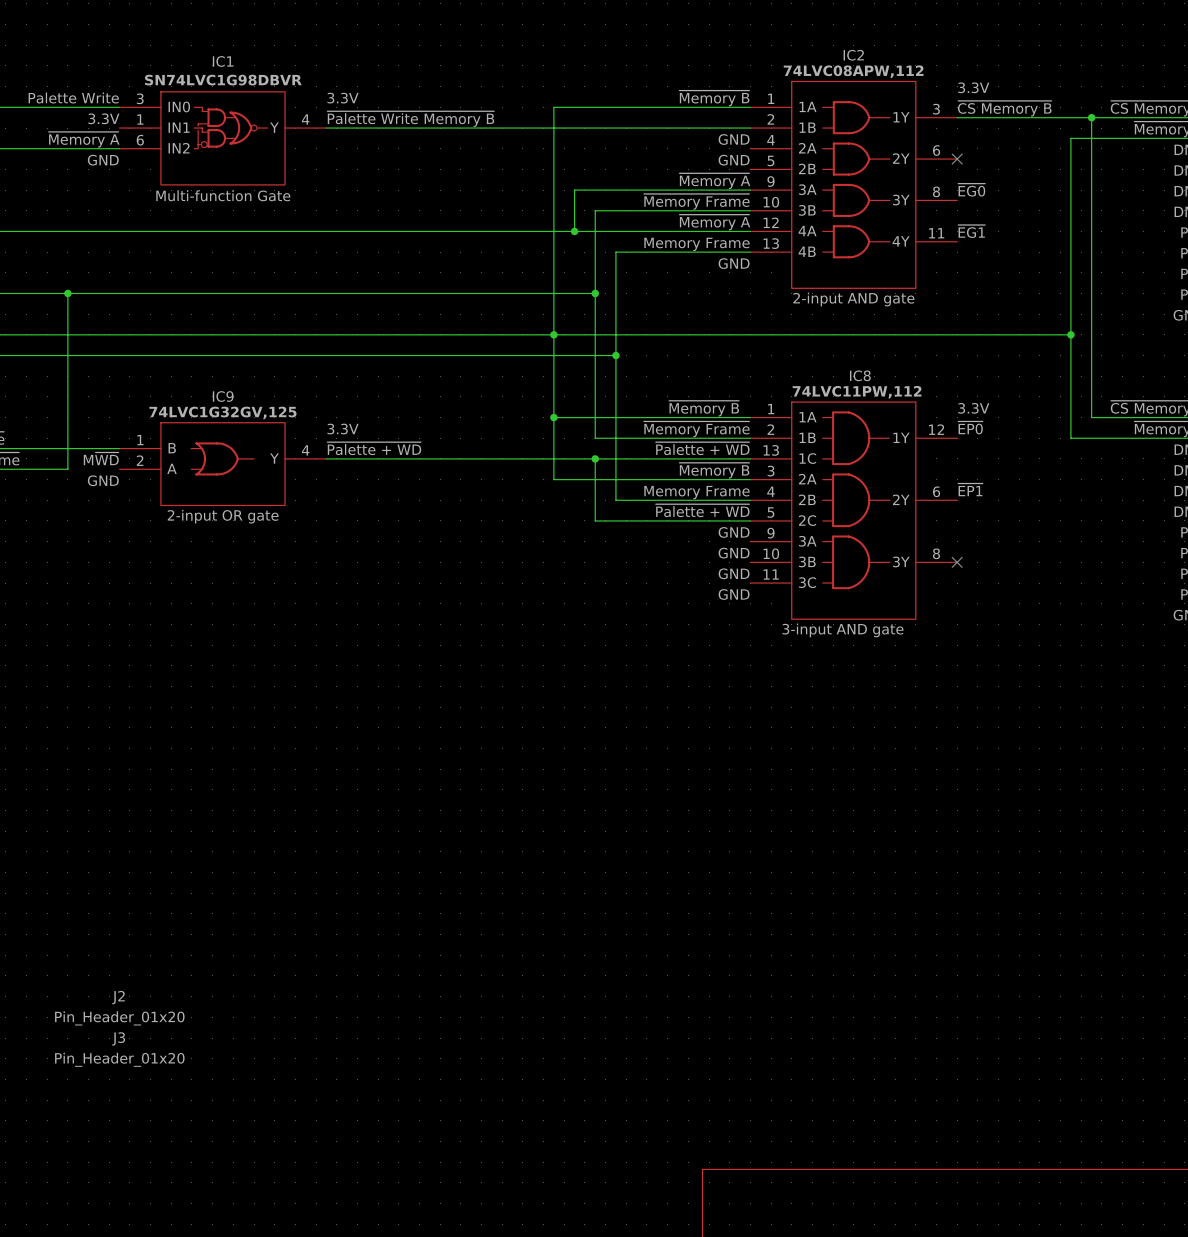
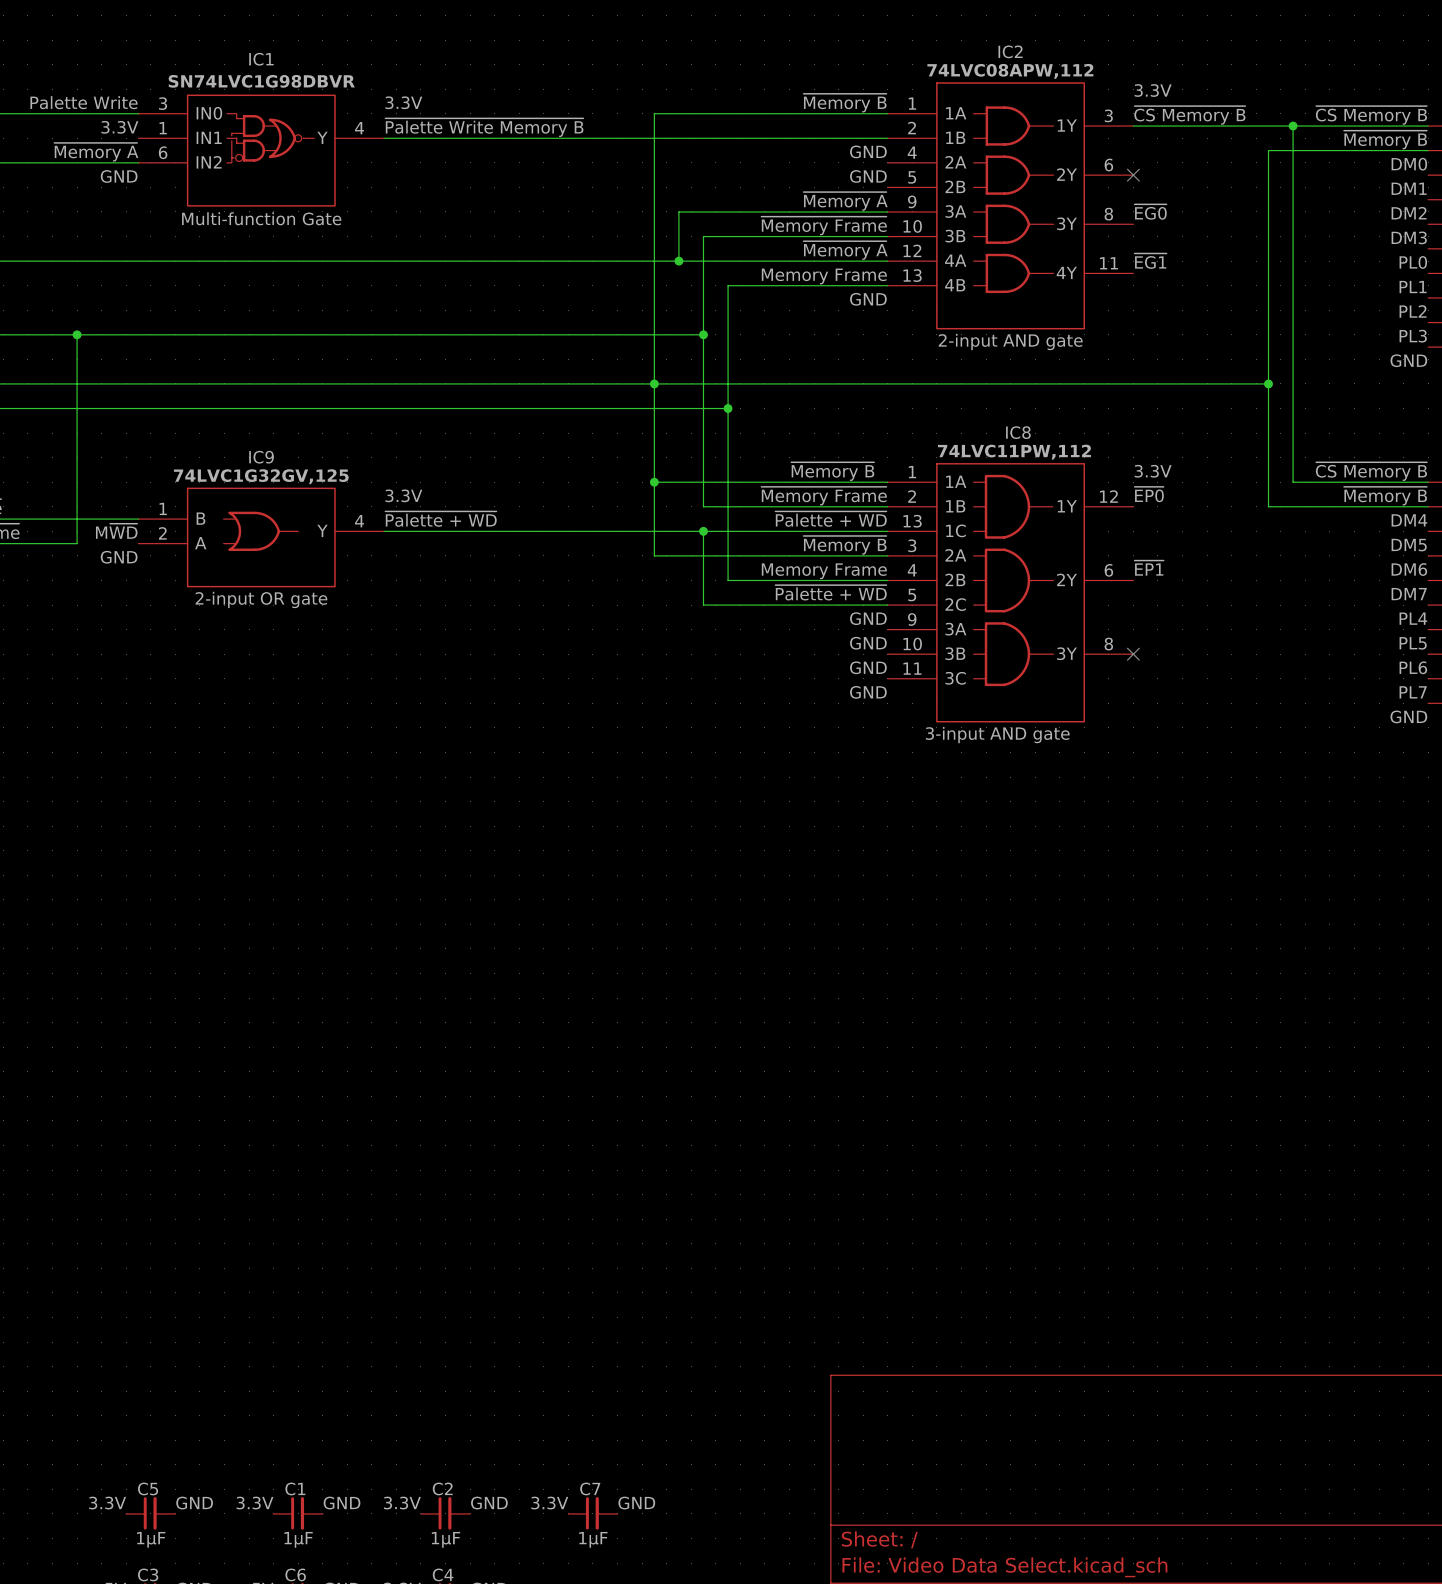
J2: Pin_Header_01x20 (119, 1008) -> none
J3: Pin_Header_01x20 (119, 1049) -> none

